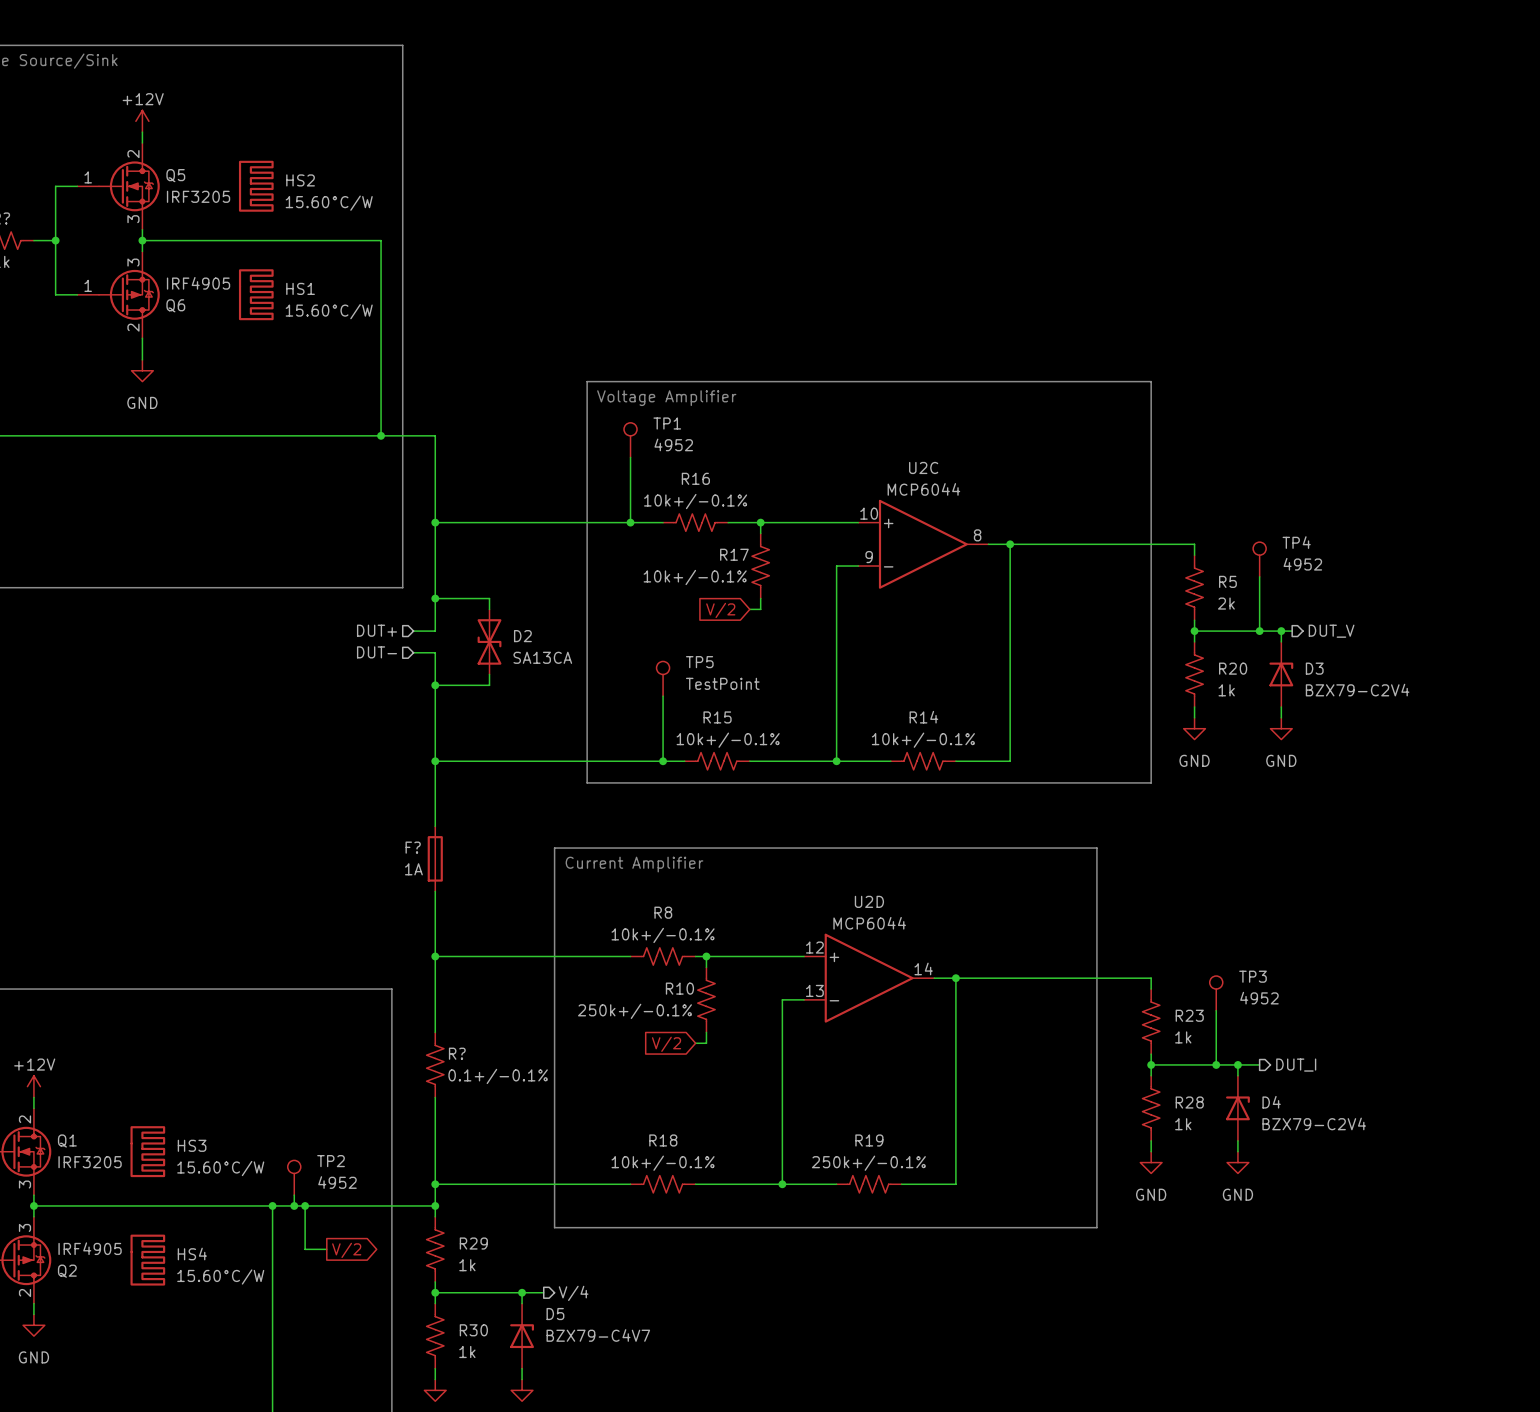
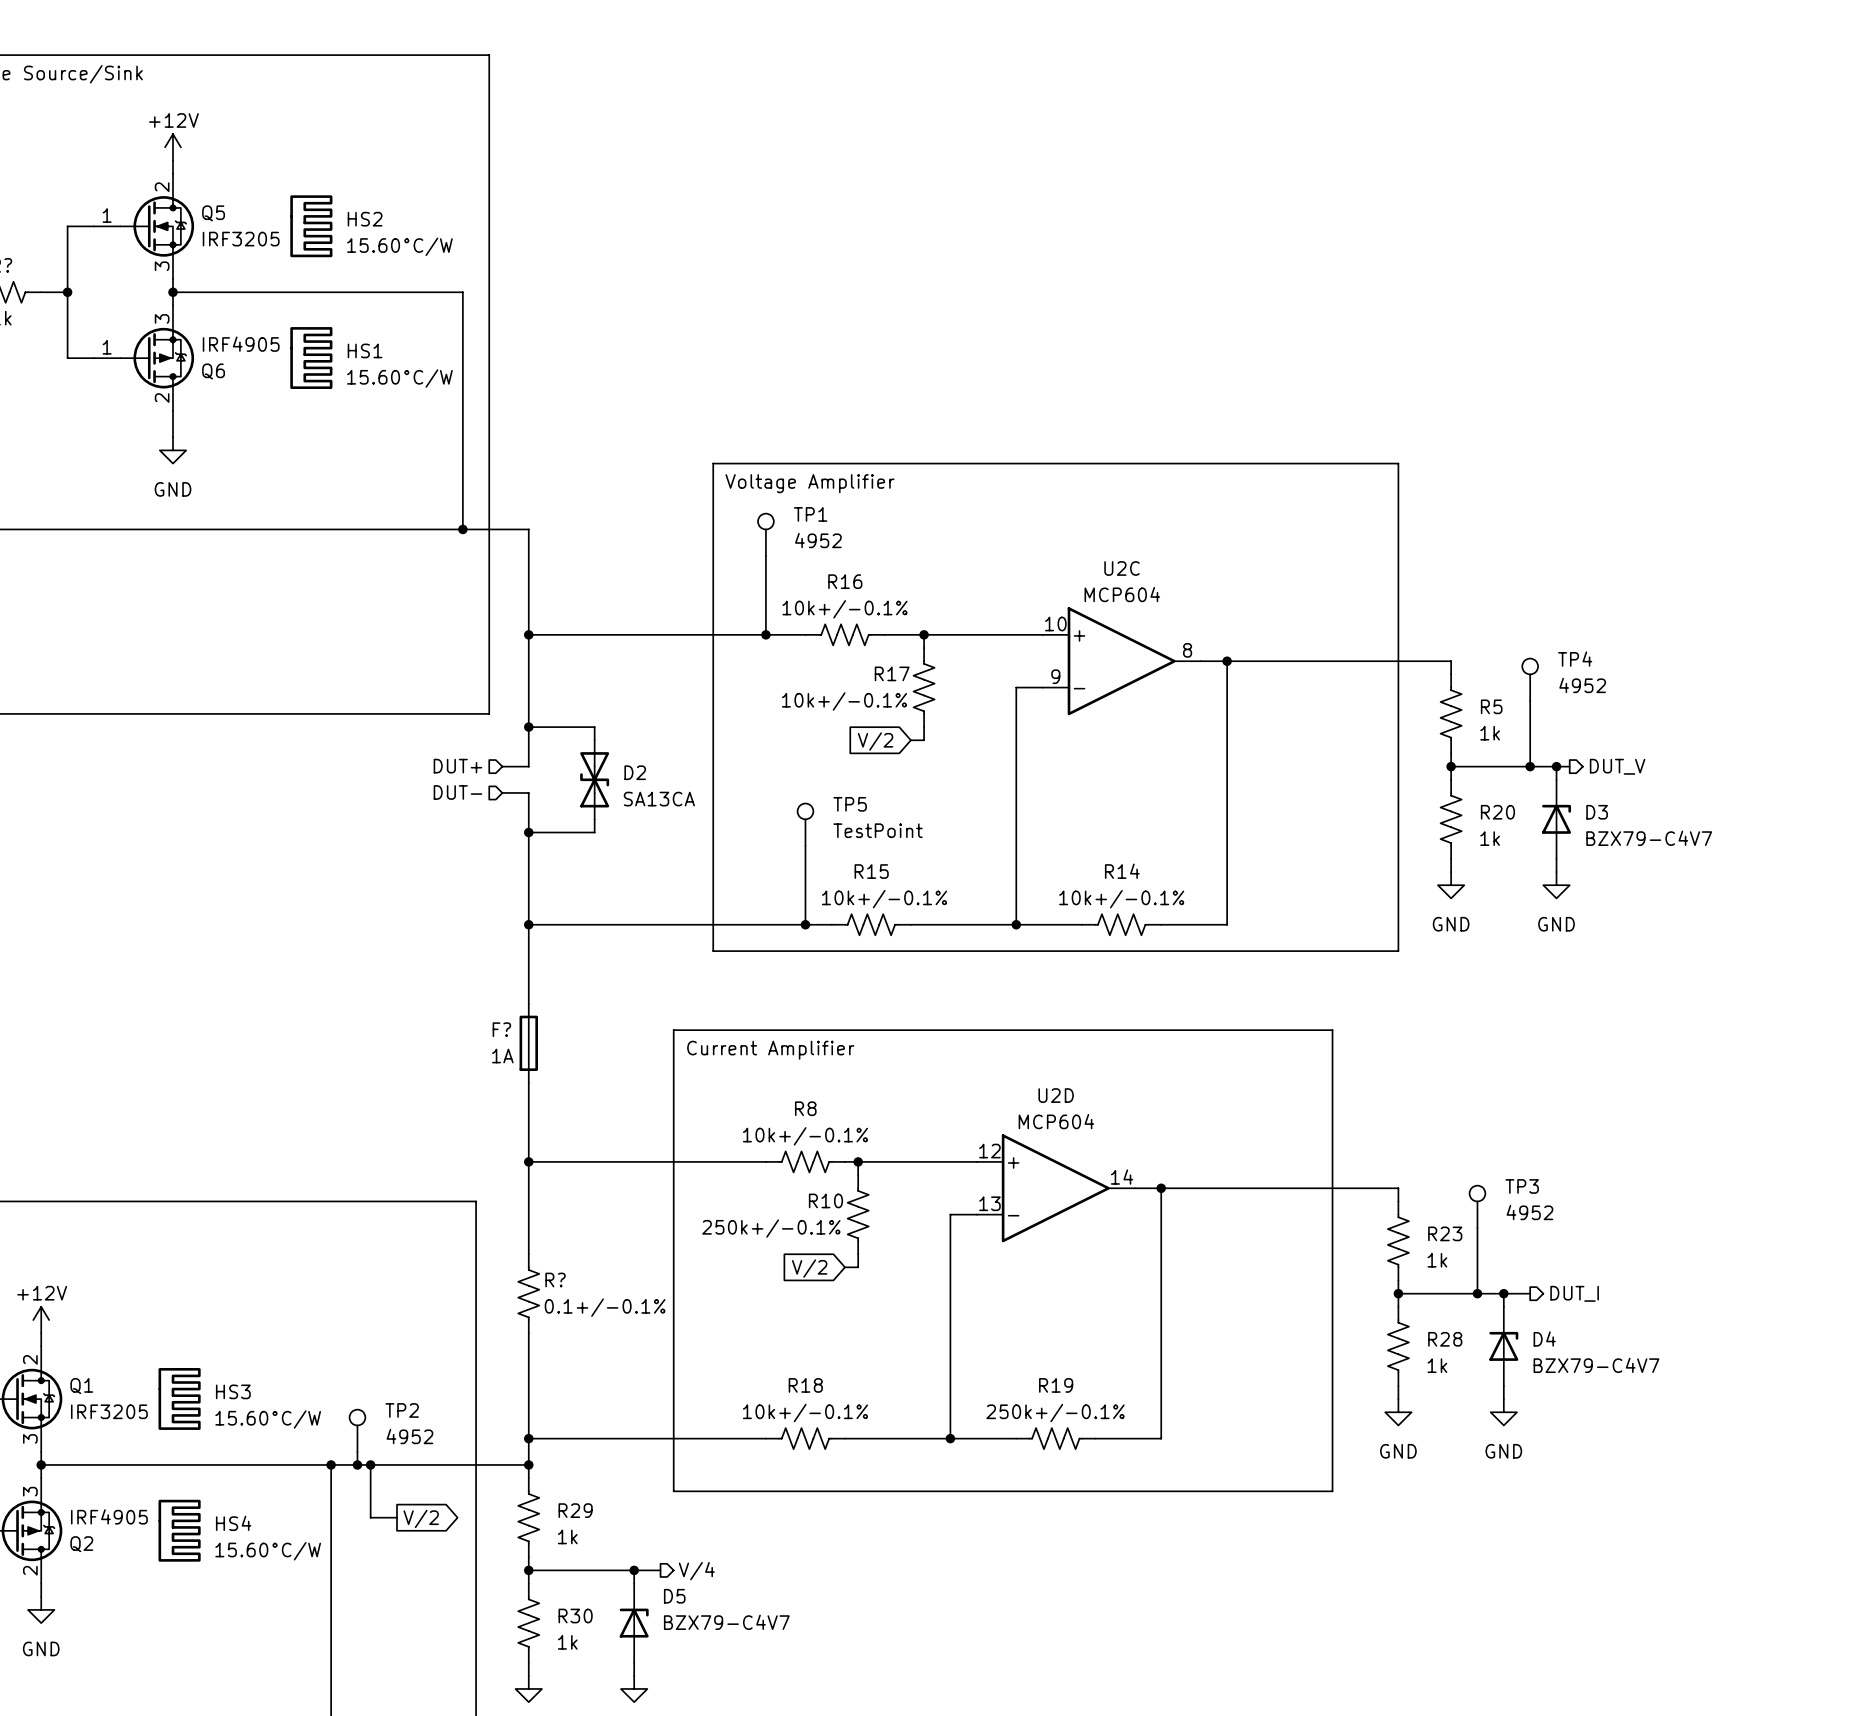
U2C value: MCP6044 (923, 489) -> MCP604 (1122, 594)
R5 value: 2k (1226, 603) -> 1k (1490, 733)
D3 value: BZX79-C2V4 (1357, 690) -> BZX79-C4V7 (1649, 838)
U2D value: MCP6044 (869, 923) -> MCP604 (1056, 1121)
D4 value: BZX79-C2V4 (1314, 1123) -> BZX79-C4V7 (1596, 1365)

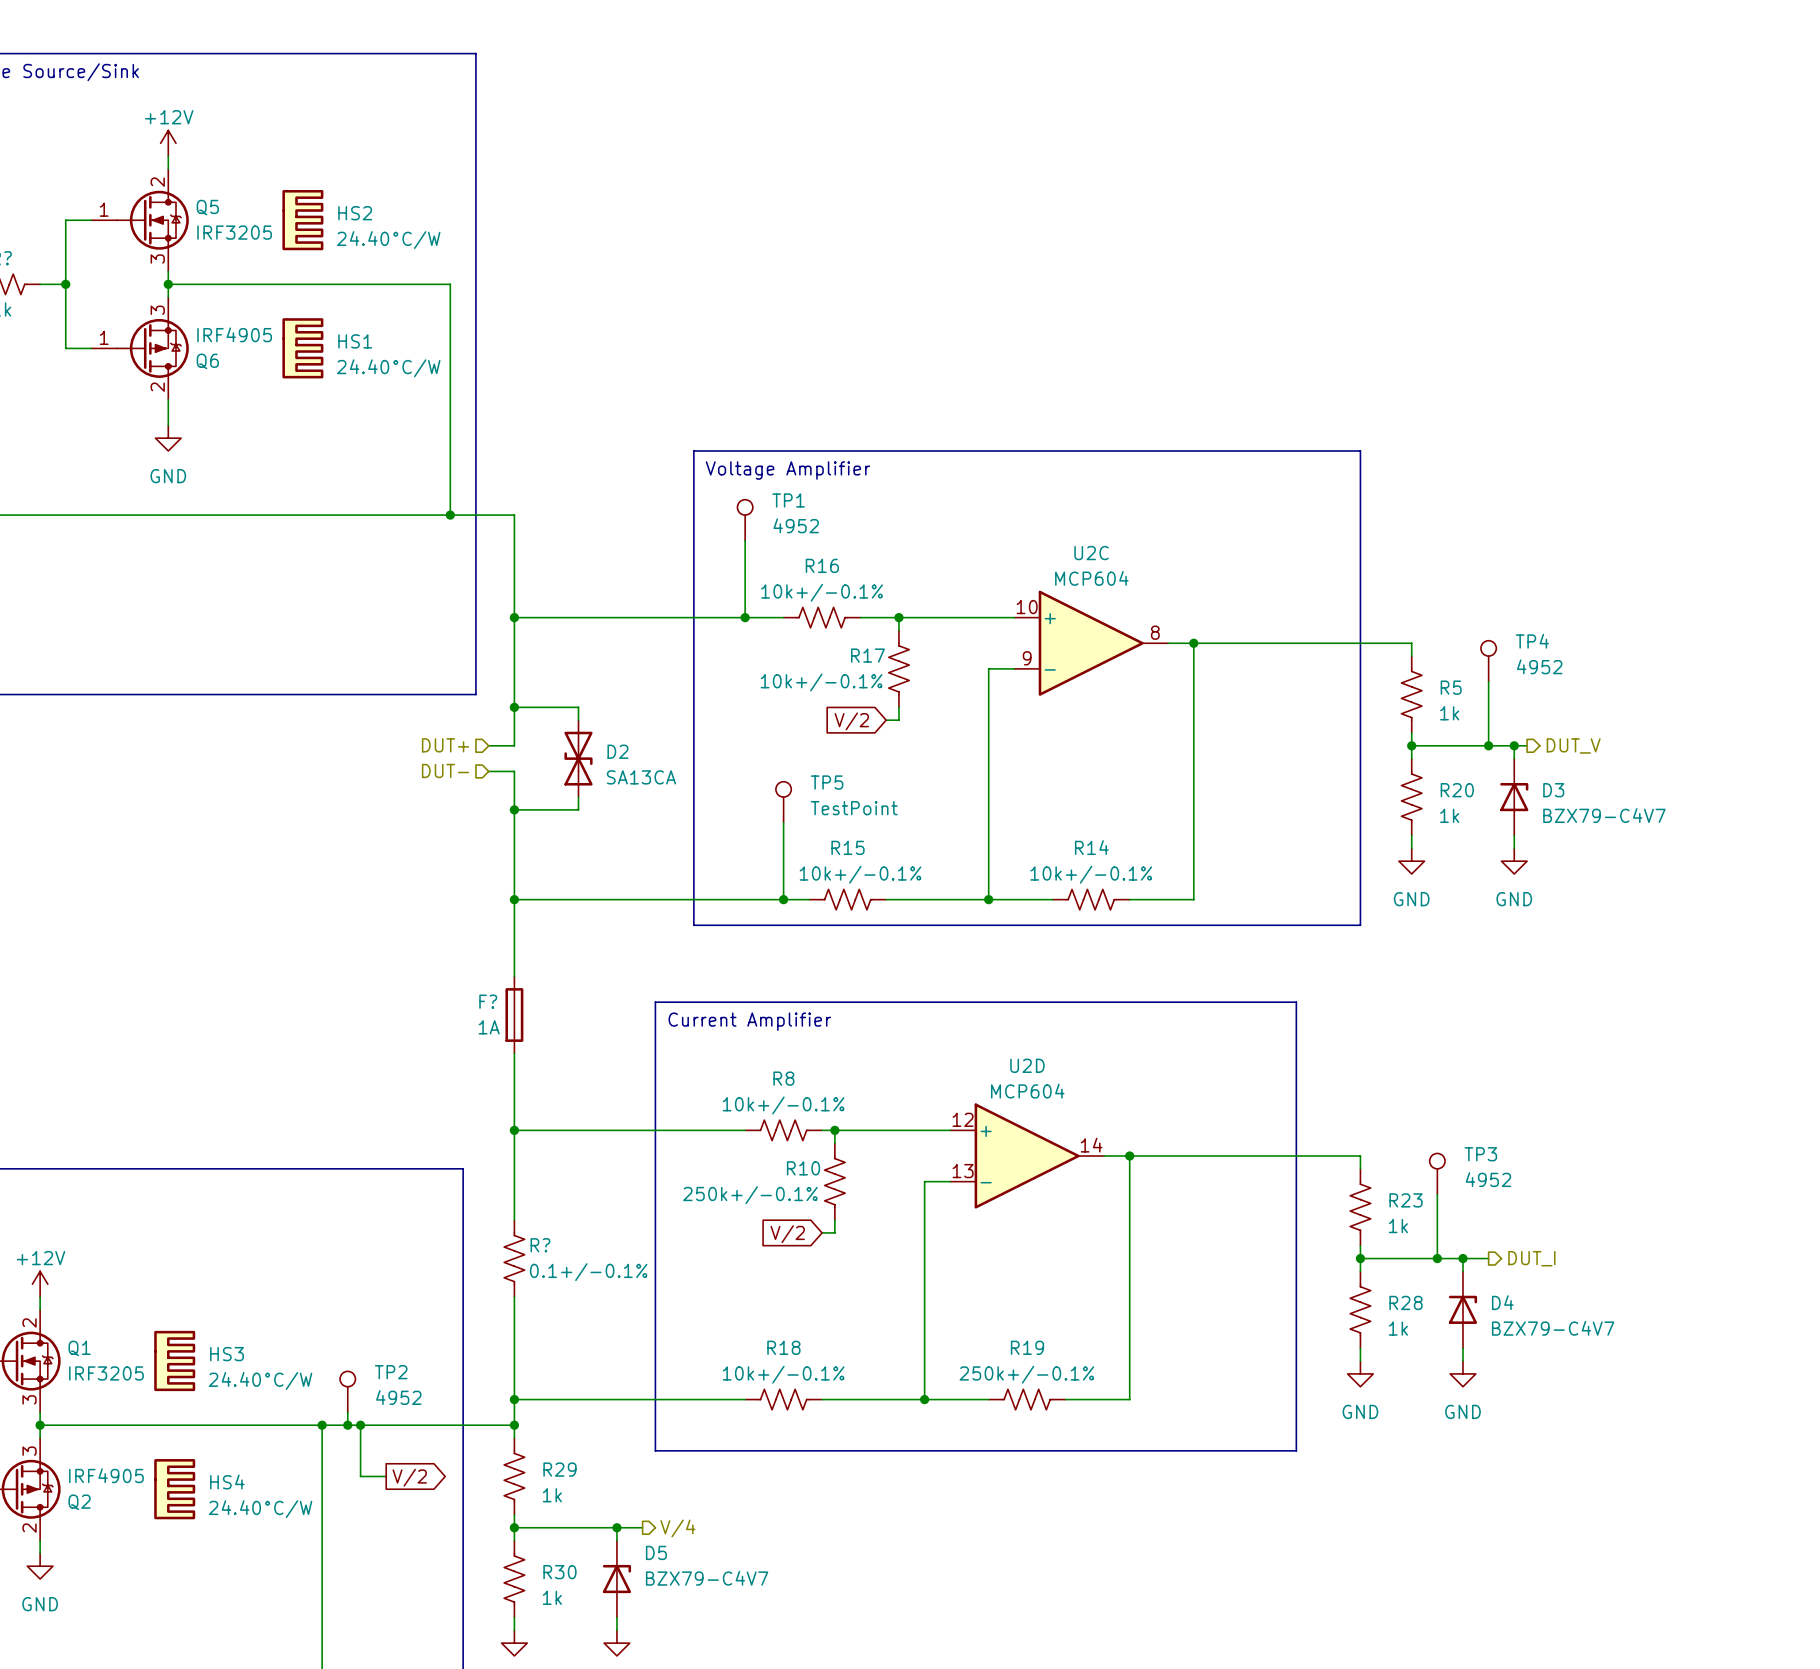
HS2 value: 15.60°C/W (399, 246) -> 24.40°C/W (388, 240)
HS1 value: 15.60°C/W (399, 378) -> 24.40°C/W (388, 368)
HS3 value: 15.60°C/W (268, 1419) -> 24.40°C/W (260, 1380)
HS4 value: 15.60°C/W (268, 1551) -> 24.40°C/W (260, 1509)

